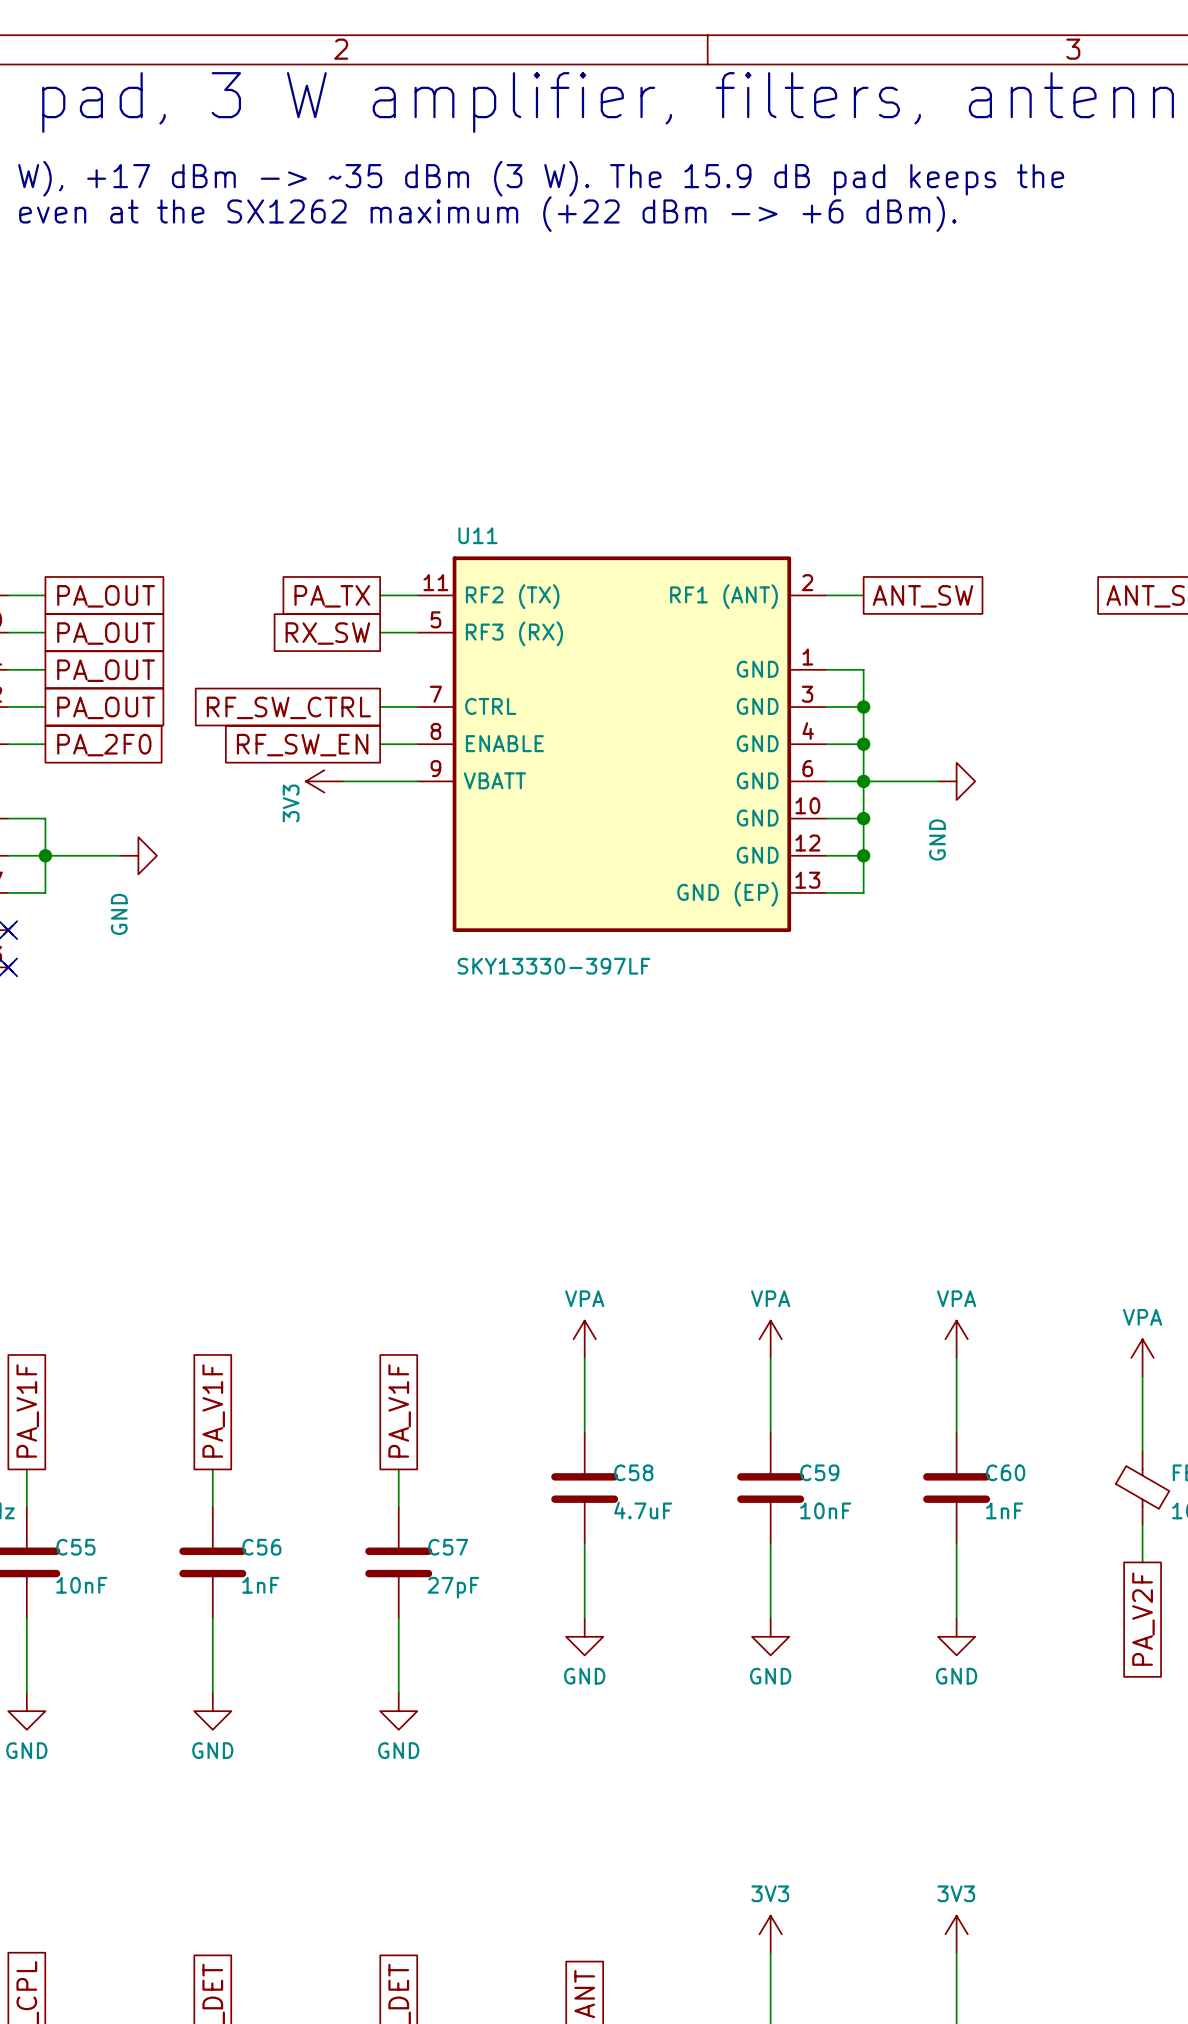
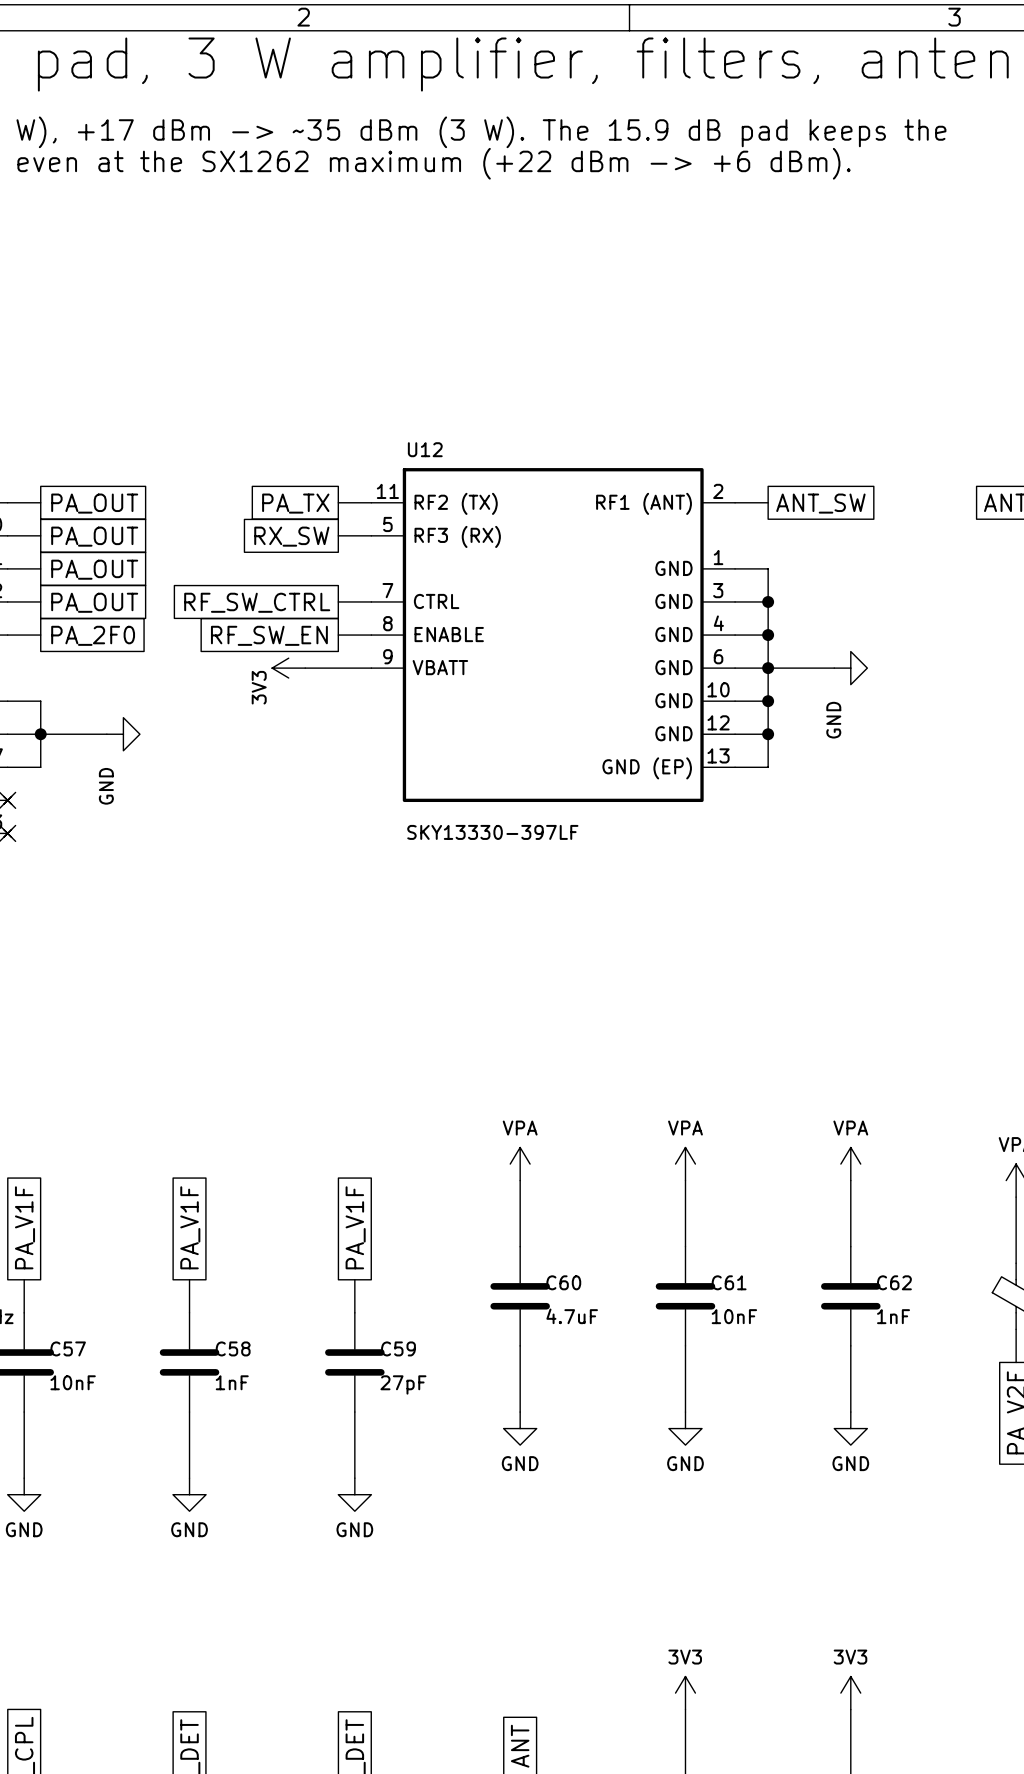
U11 name: U11 (477, 535) -> U12 (425, 449)
C58 name: C58 (633, 1472) -> C60 (563, 1282)
C59 name: C59 (819, 1472) -> C61 (729, 1282)
C60 name: C60 (1005, 1472) -> C62 (894, 1282)
C55 name: C55 (75, 1547) -> C57 (68, 1348)
C56 name: C56 (261, 1547) -> C58 (233, 1348)
C57 name: C57 (448, 1547) -> C59 (398, 1348)

